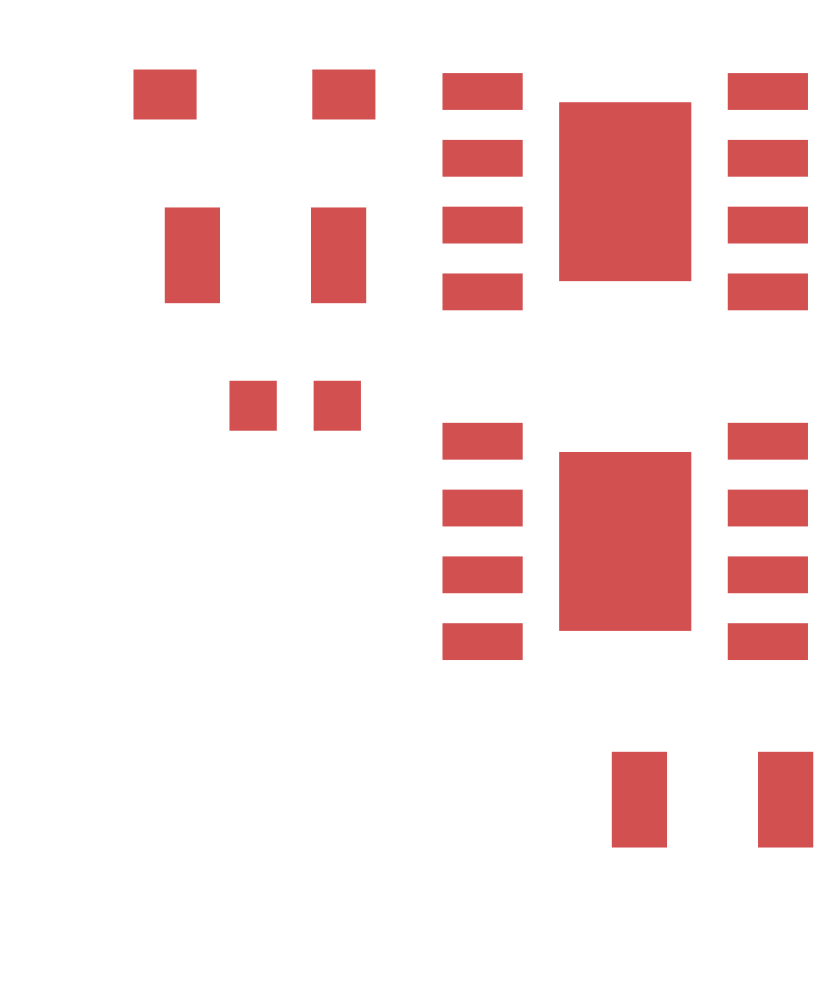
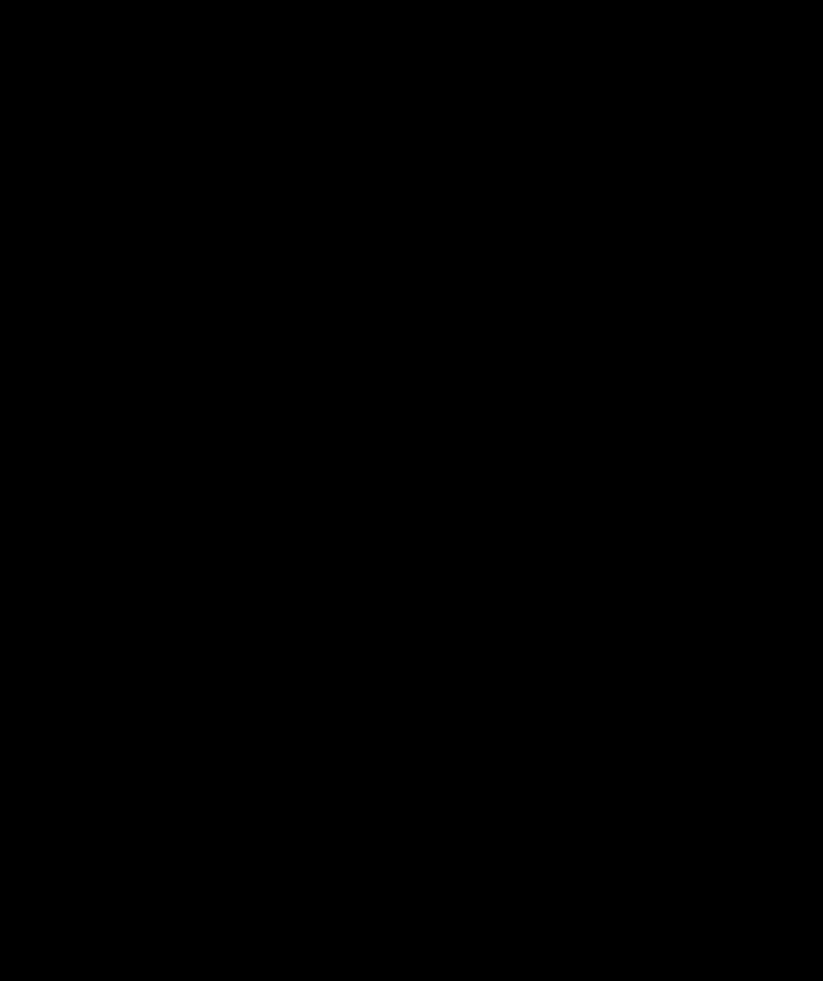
part: (254, 94) -> none
part: (625, 191) -> none
part: (265, 255) -> none
part: (295, 405) -> none
part: (625, 541) -> none
part: (712, 799) -> none

